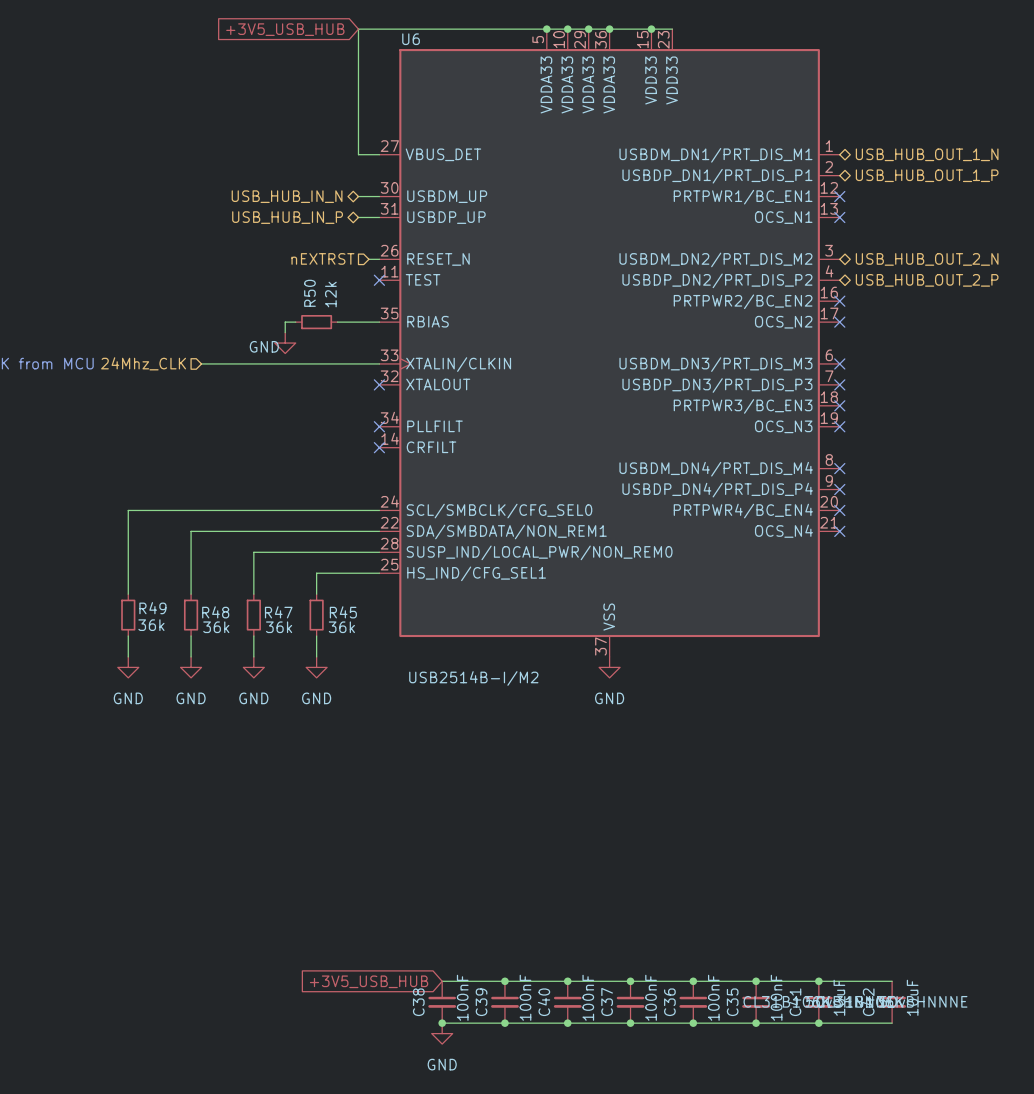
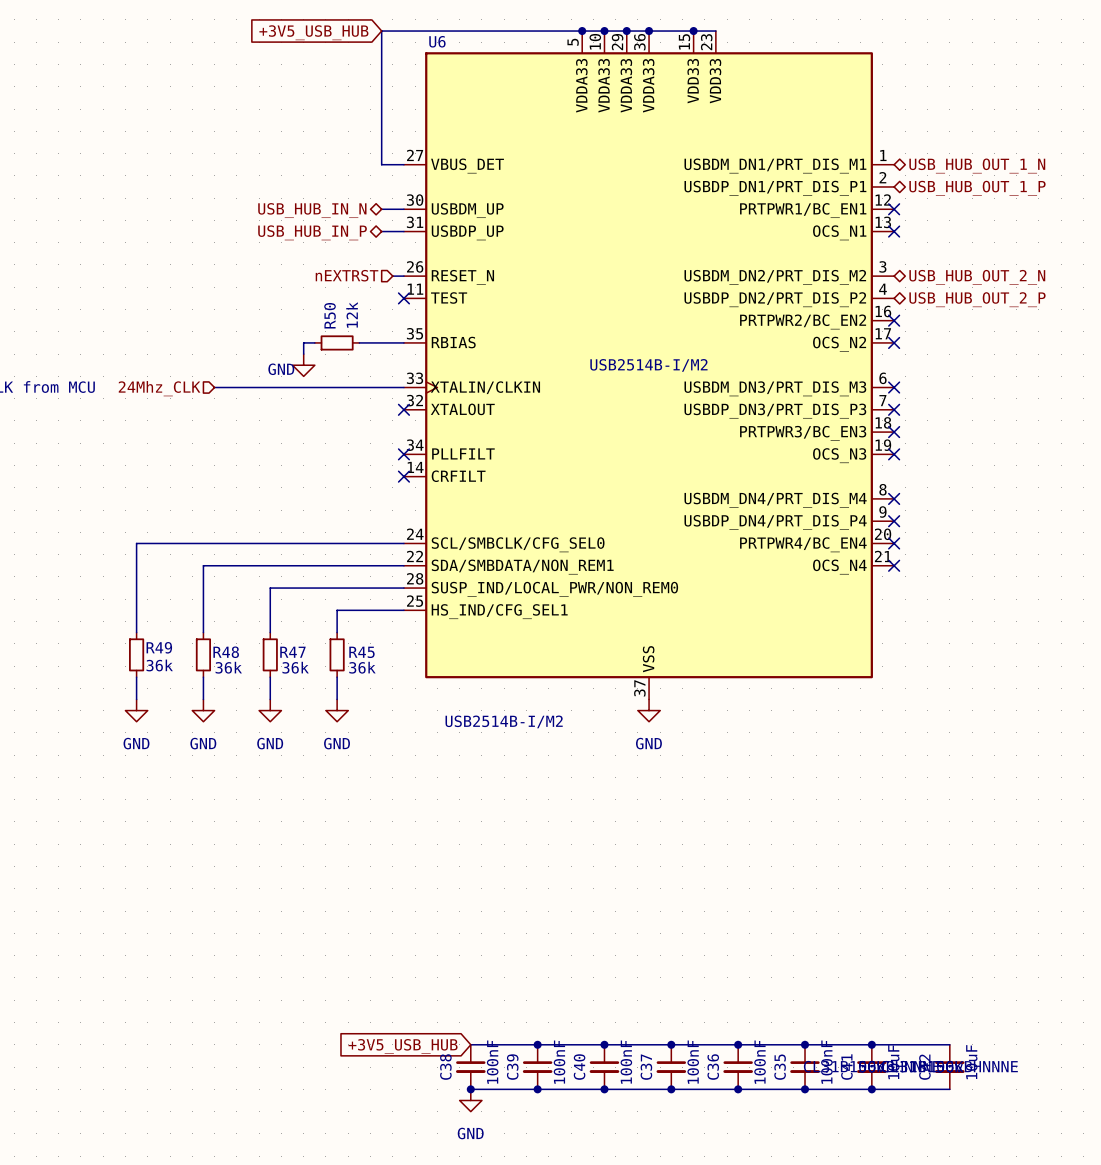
U6 text: none -> USB2514B-I/M2 (648, 365)

